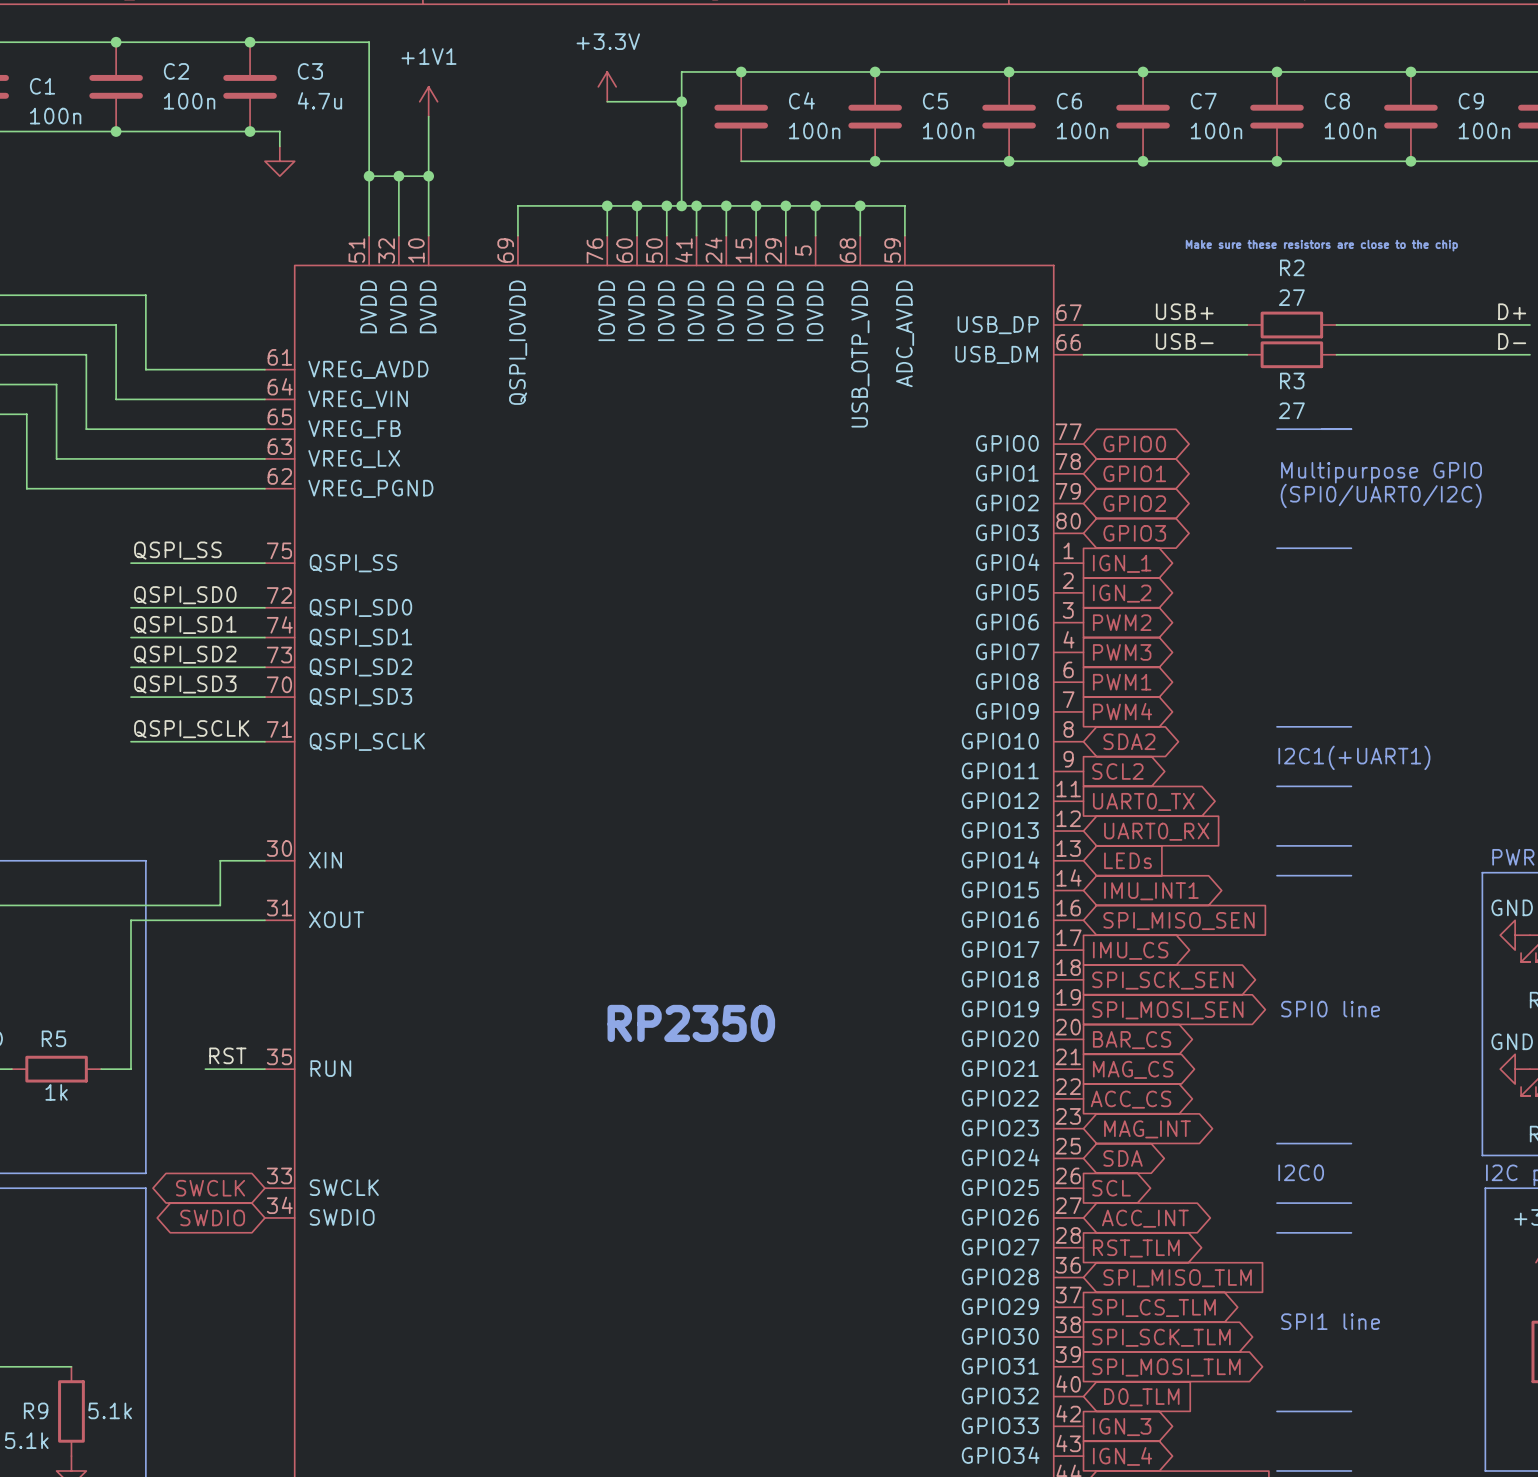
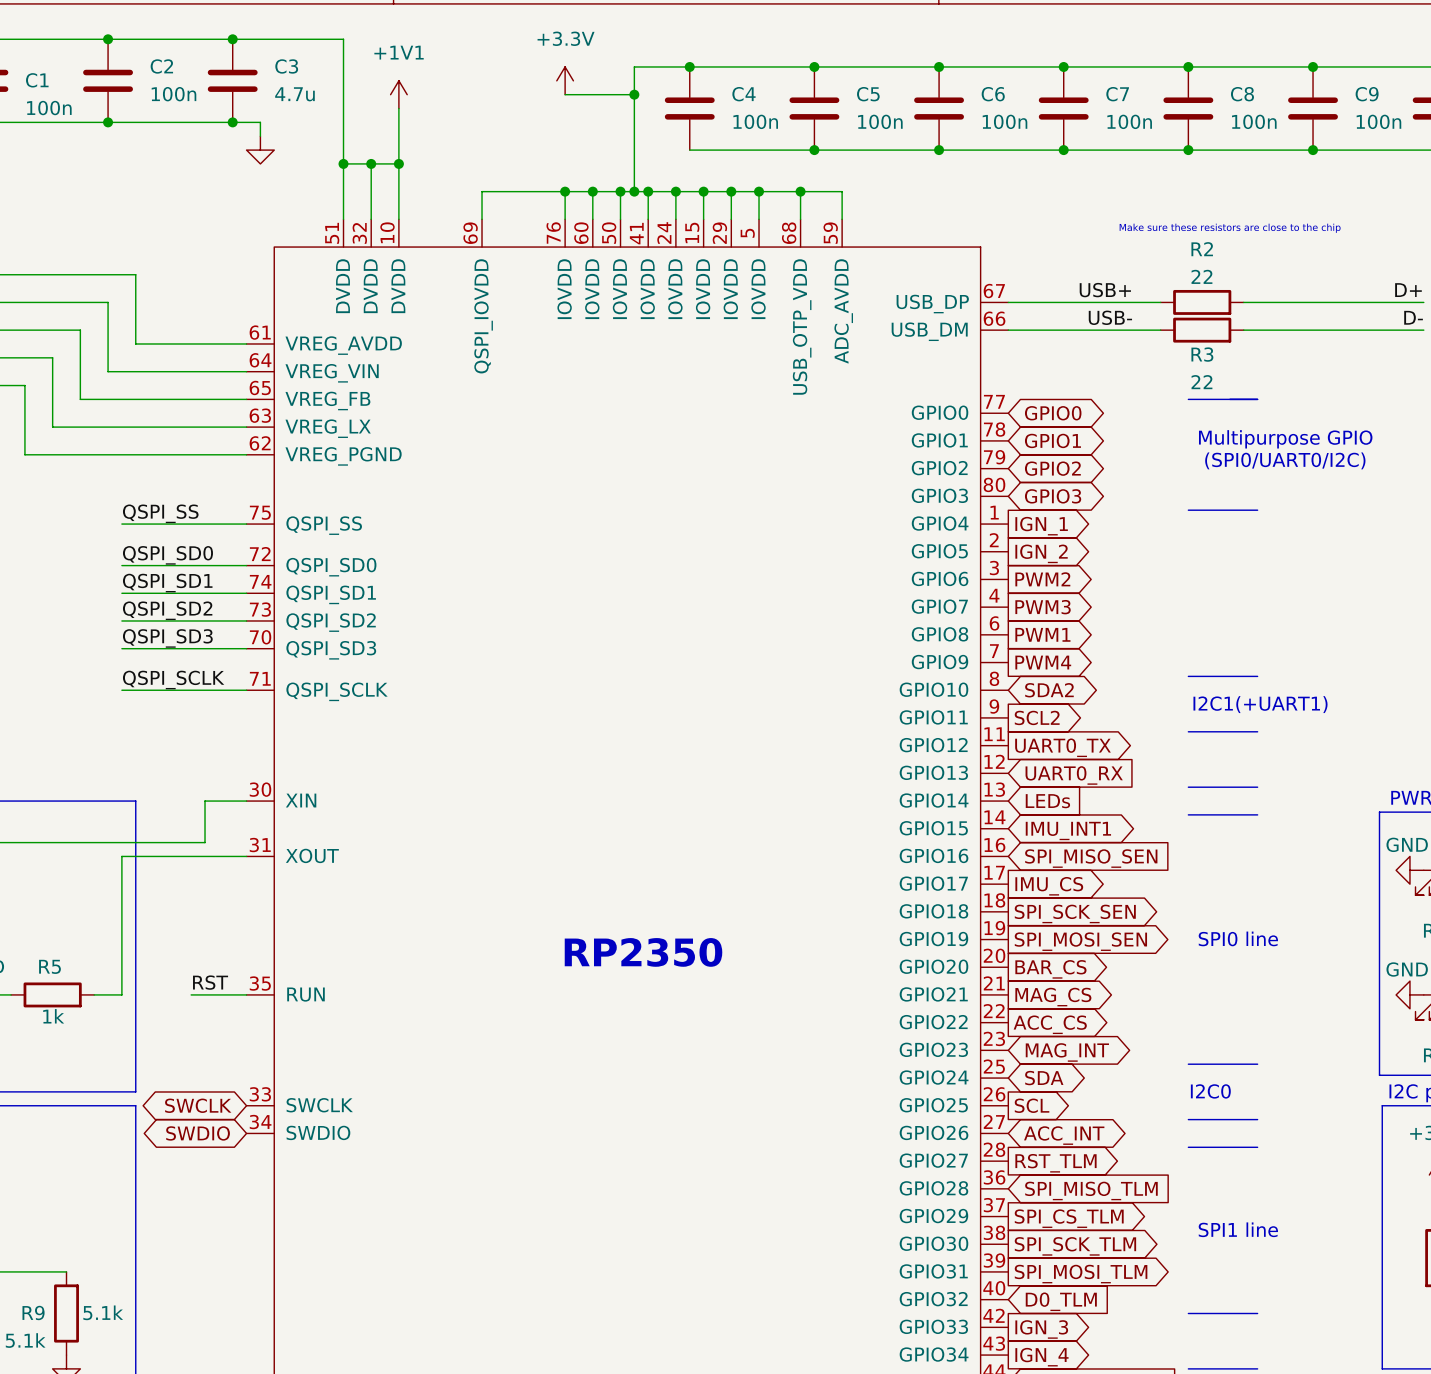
R2 value: 27 (1291, 297) -> 22 (1201, 276)
R3 value: 27 (1291, 410) -> 22 (1201, 382)

